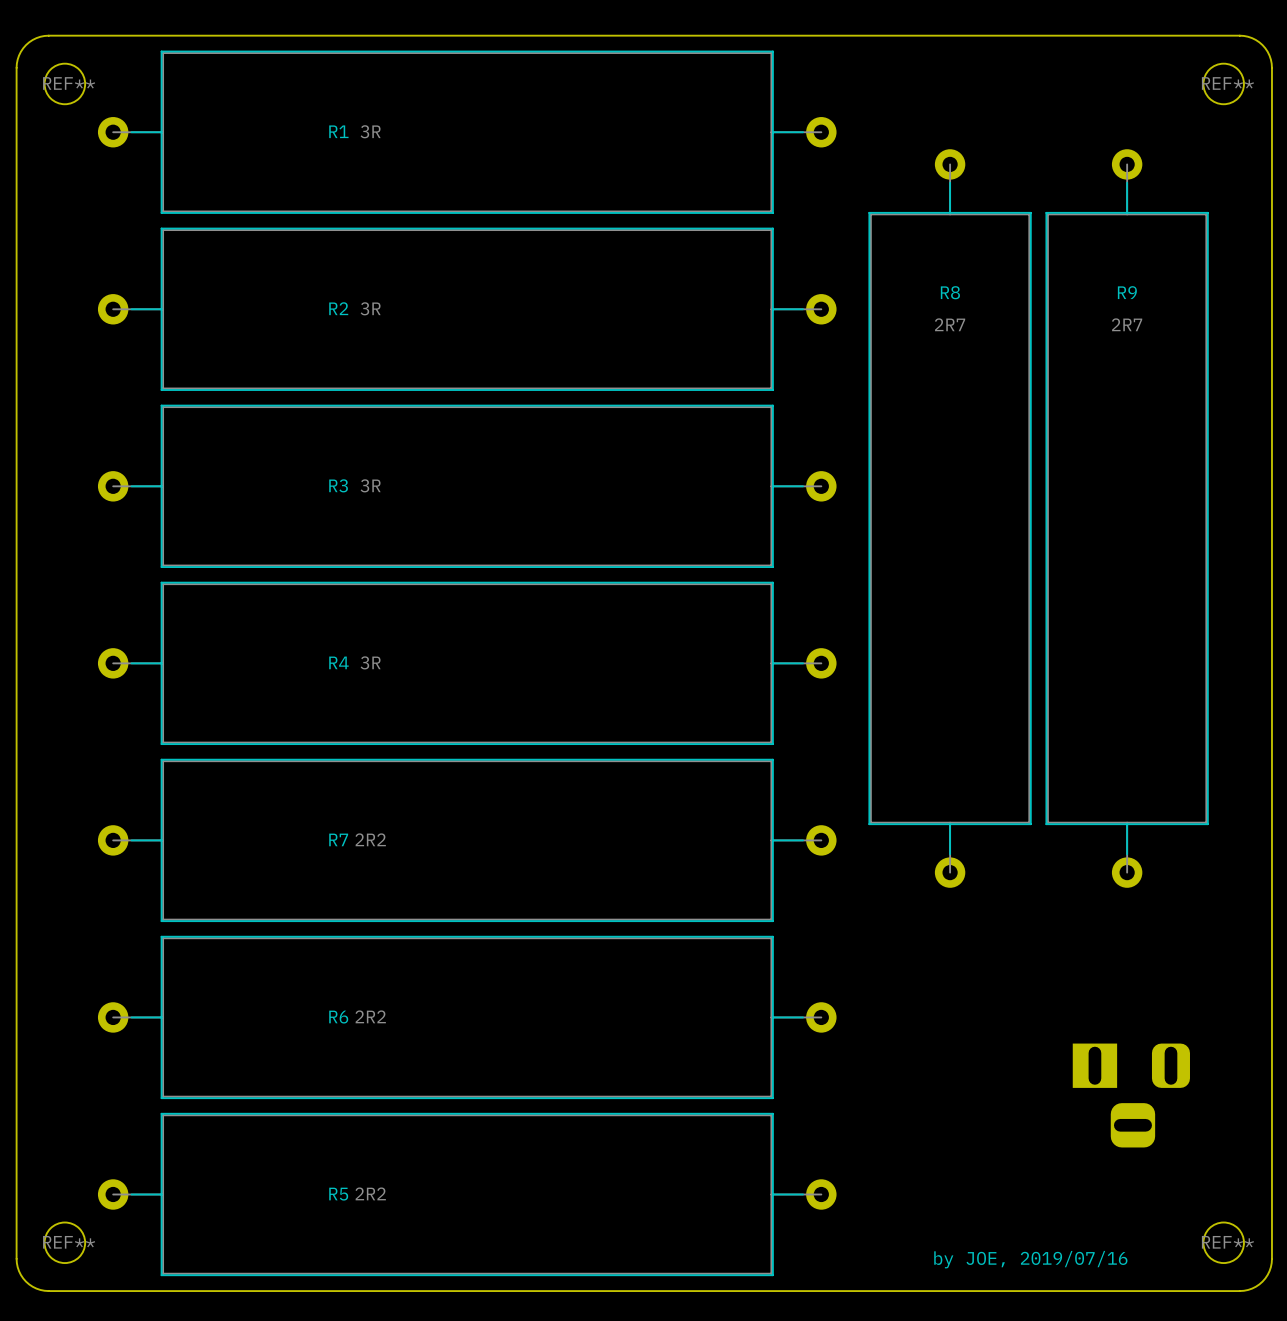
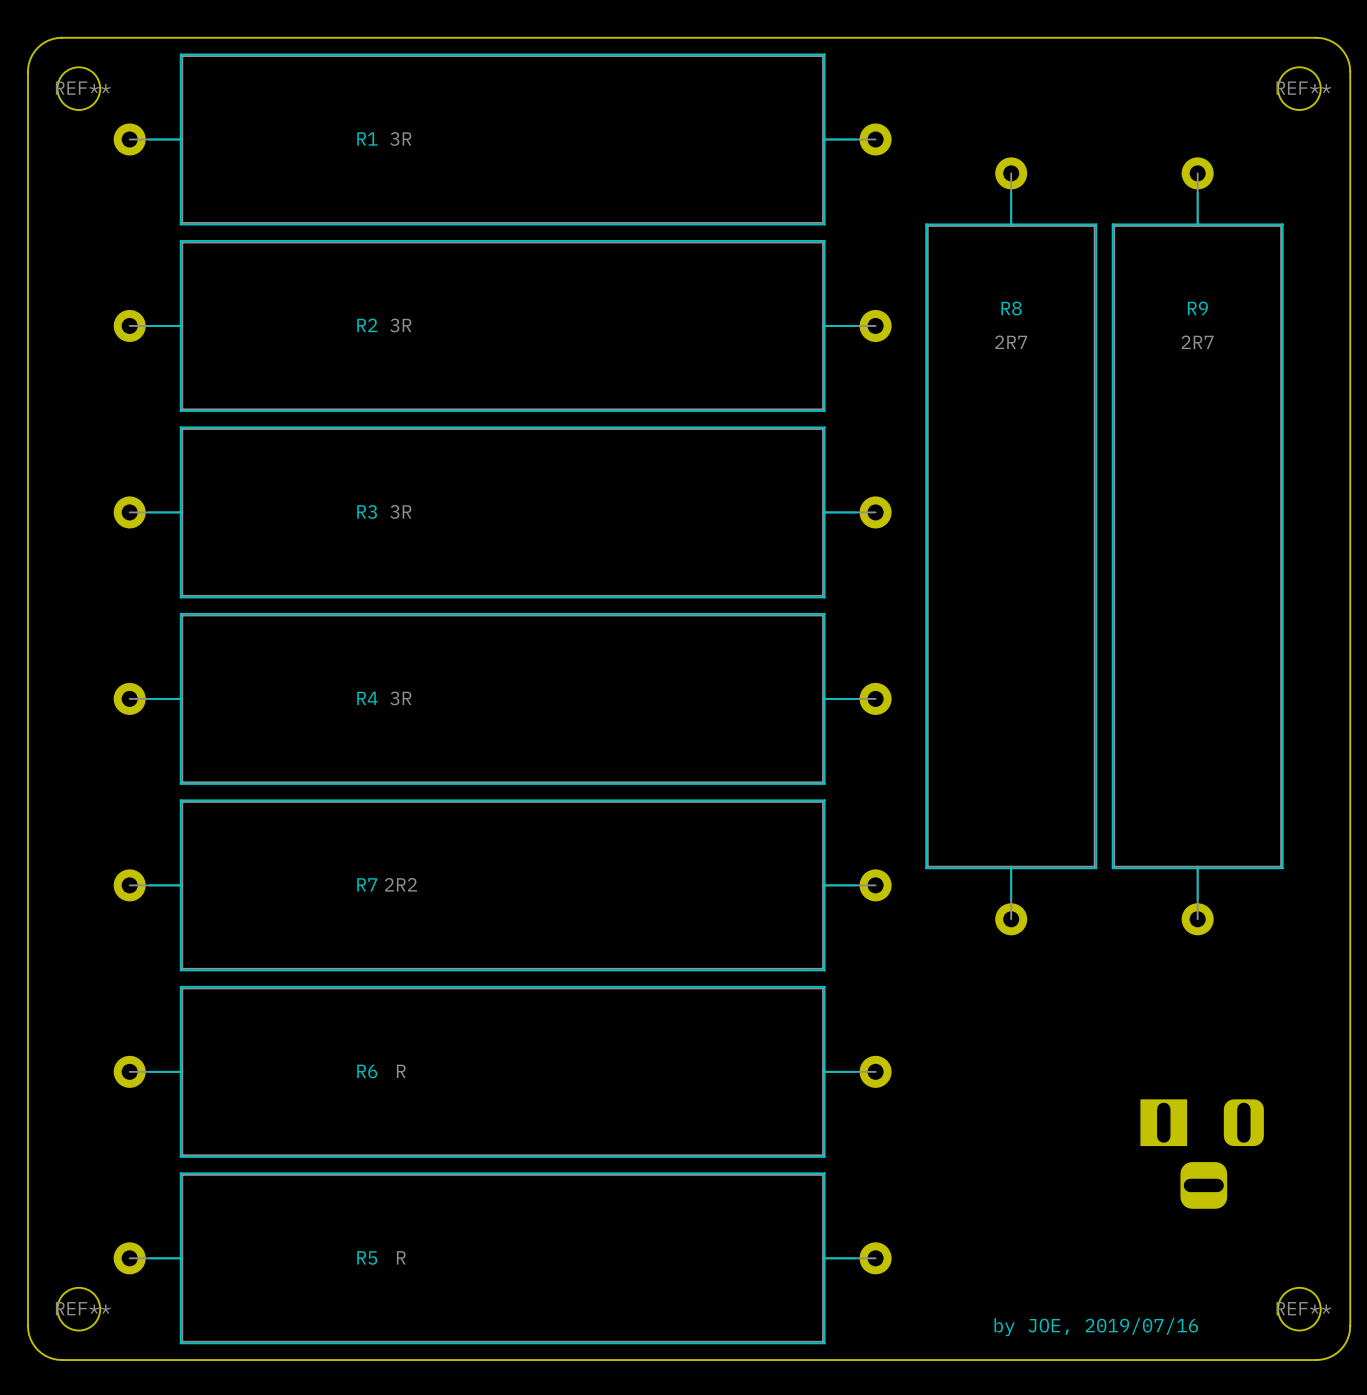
R6 value: 2R2 (370, 1016) -> R (401, 1071)
R5 value: 2R2 (370, 1193) -> R (401, 1257)

